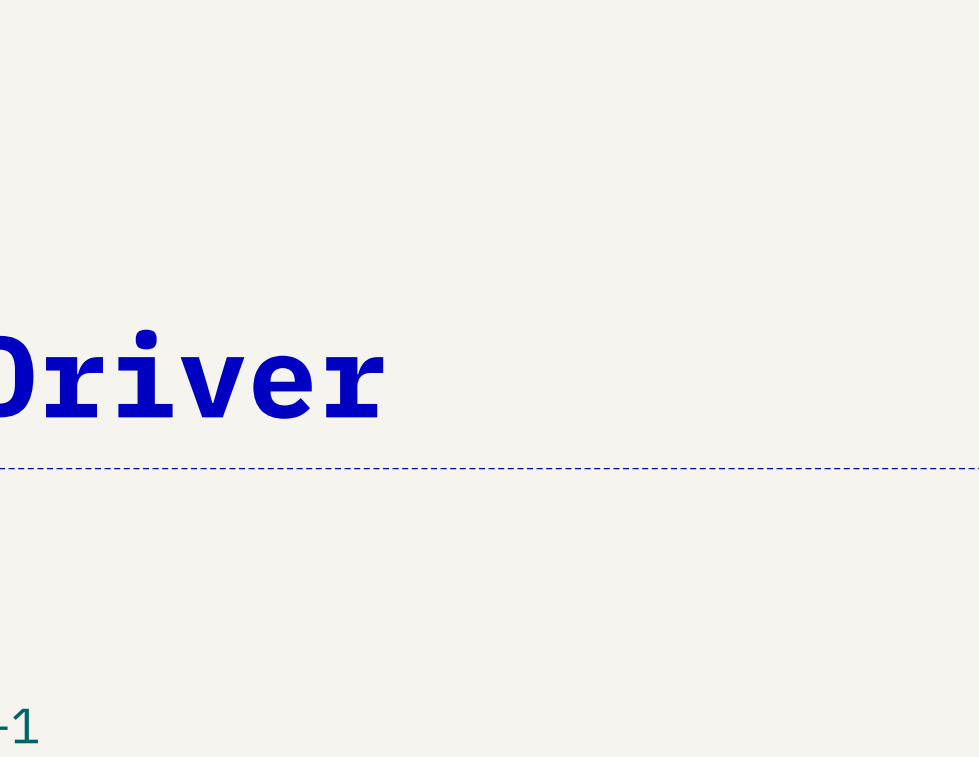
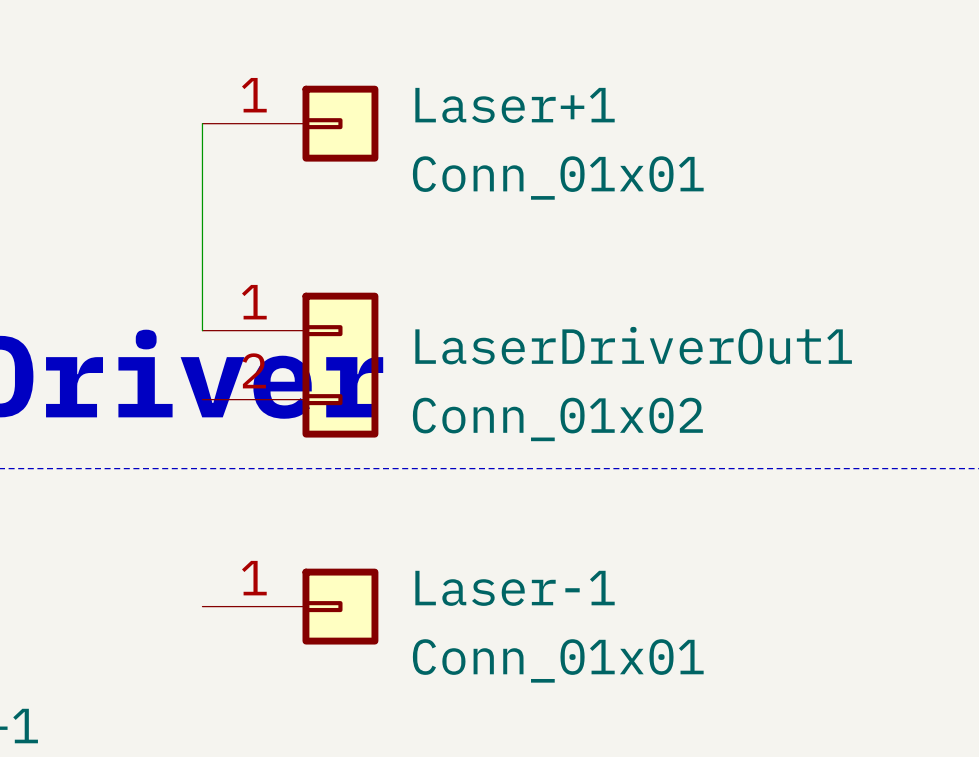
wire: none -> (202, 123) (202, 330)
Laser+1: none -> Conn_01x01 (290, 123)
LaserDriverOut1: none -> Conn_01x02 (290, 365)
Laser-1: none -> Conn_01x01 (290, 606)

